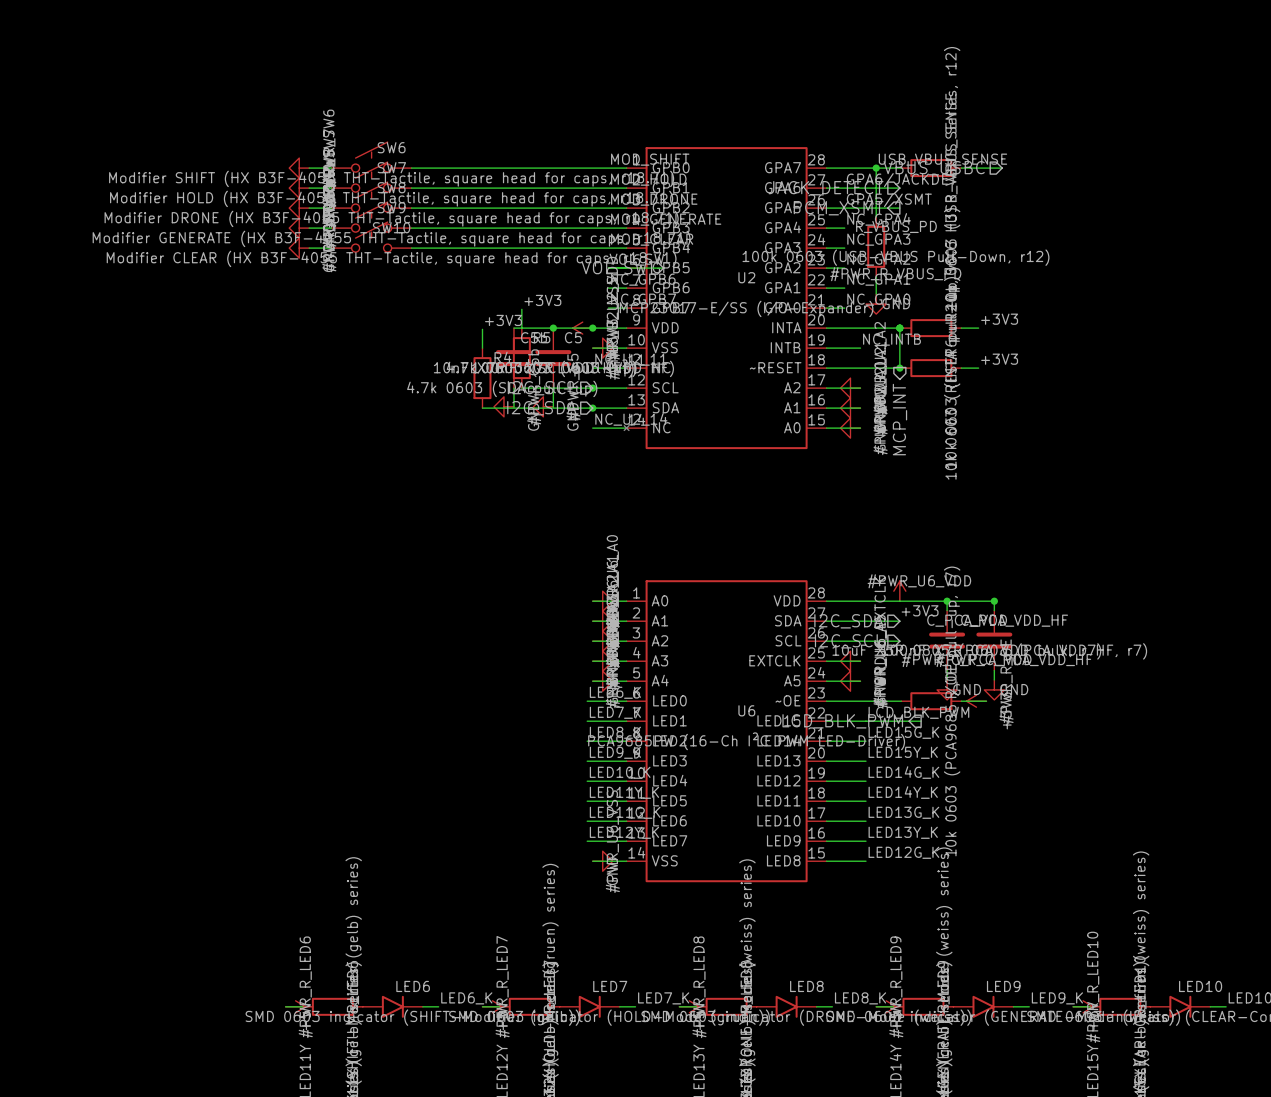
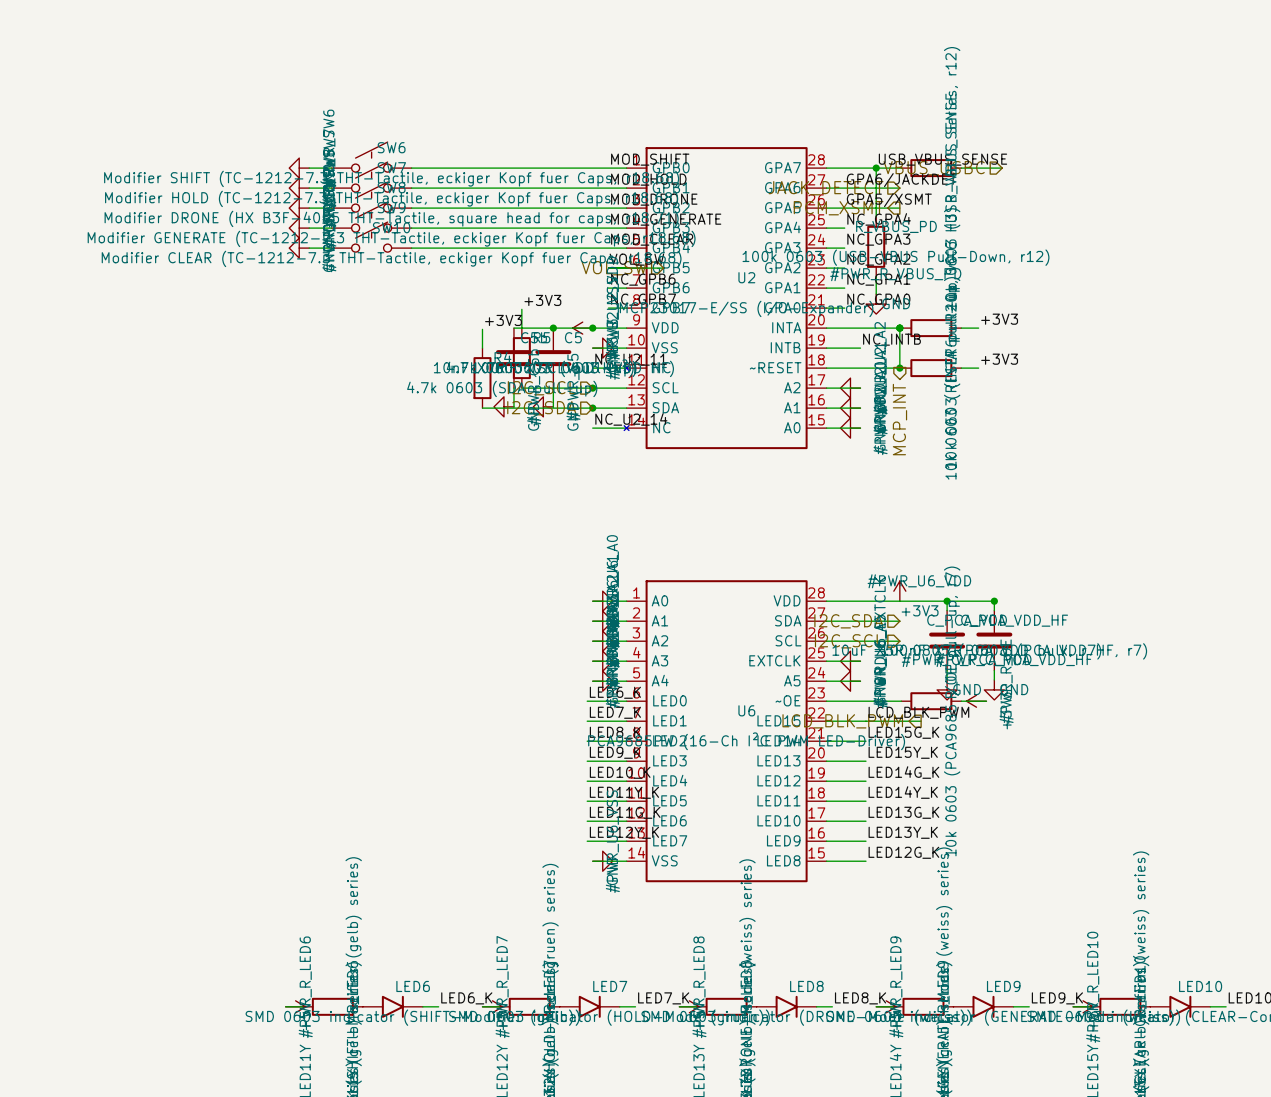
SW6 value: Modifier SHIFT (HX B3F-4055 THT-Tactile, square head for caps, r18.71) (391, 178) -> Modifier SHIFT (TC-1212-7.3 THT-Tactile, eckiger Kopf fuer Caps, r18.68) (391, 178)
SW7 value: Modifier HOLD (HX B3F-4055 THT-Tactile, square head for caps, r18.71) (391, 198) -> Modifier HOLD (TC-1212-7.3 THT-Tactile, eckiger Kopf fuer Caps, r18.68) (391, 198)
SW9 value: Modifier GENERATE (HX B3F-4055 THT-Tactile, square head for caps, r18.71) (391, 238) -> Modifier GENERATE (TC-1212-7.3 THT-Tactile, eckiger Kopf fuer Caps, r18.68) (391, 238)
SW10 value: Modifier CLEAR (HX B3F-4055 THT-Tactile, square head for caps, r18.71) (391, 258) -> Modifier CLEAR (TC-1212-7.3 THT-Tactile, eckiger Kopf fuer Caps, r18.68) (391, 258)

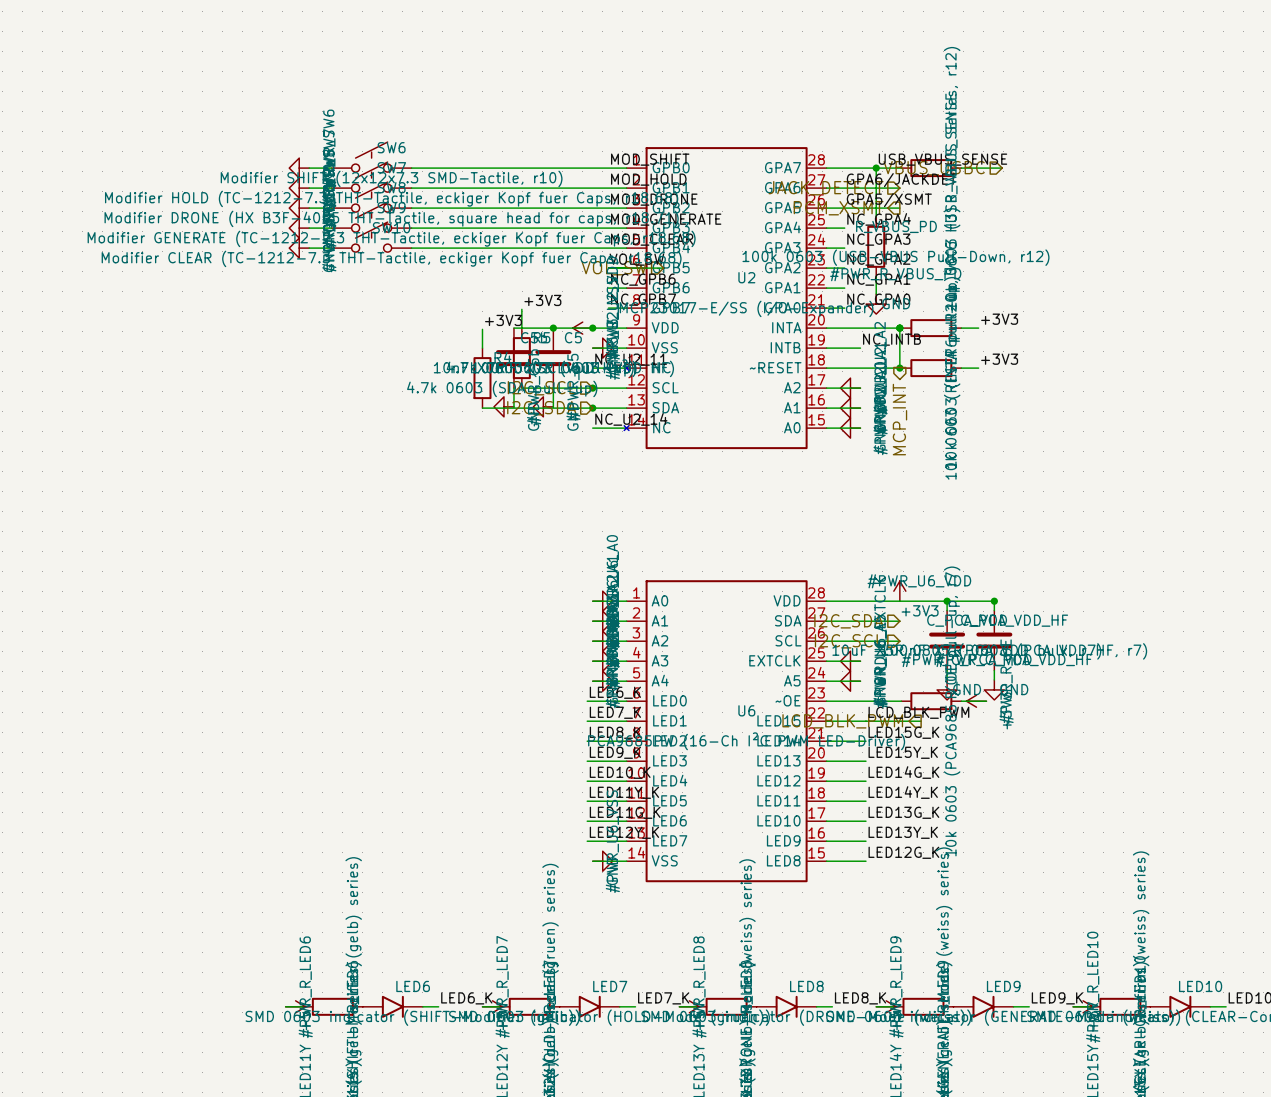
SW6 value: Modifier SHIFT (TC-1212-7.3 THT-Tactile, eckiger Kopf fuer Caps, r18.68) (391, 178) -> Modifier SHIFT (12x12x7.3 SMD-Tactile, r10) (391, 178)

